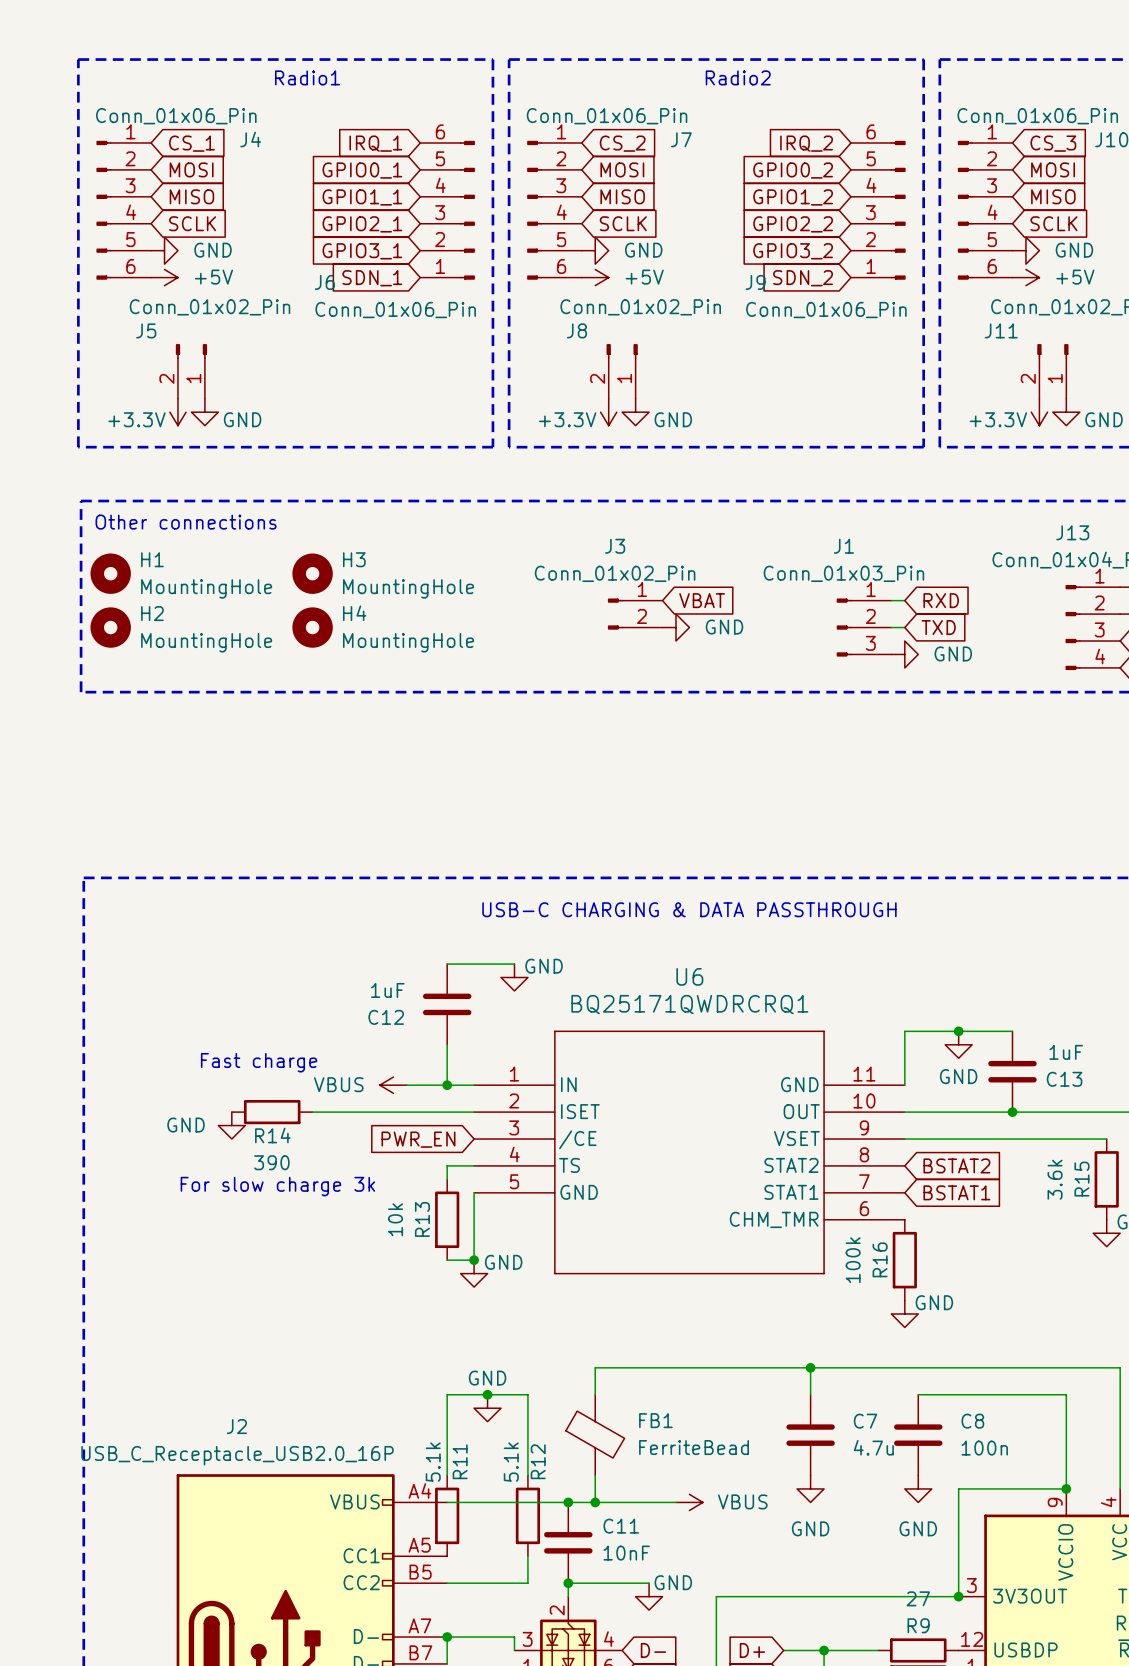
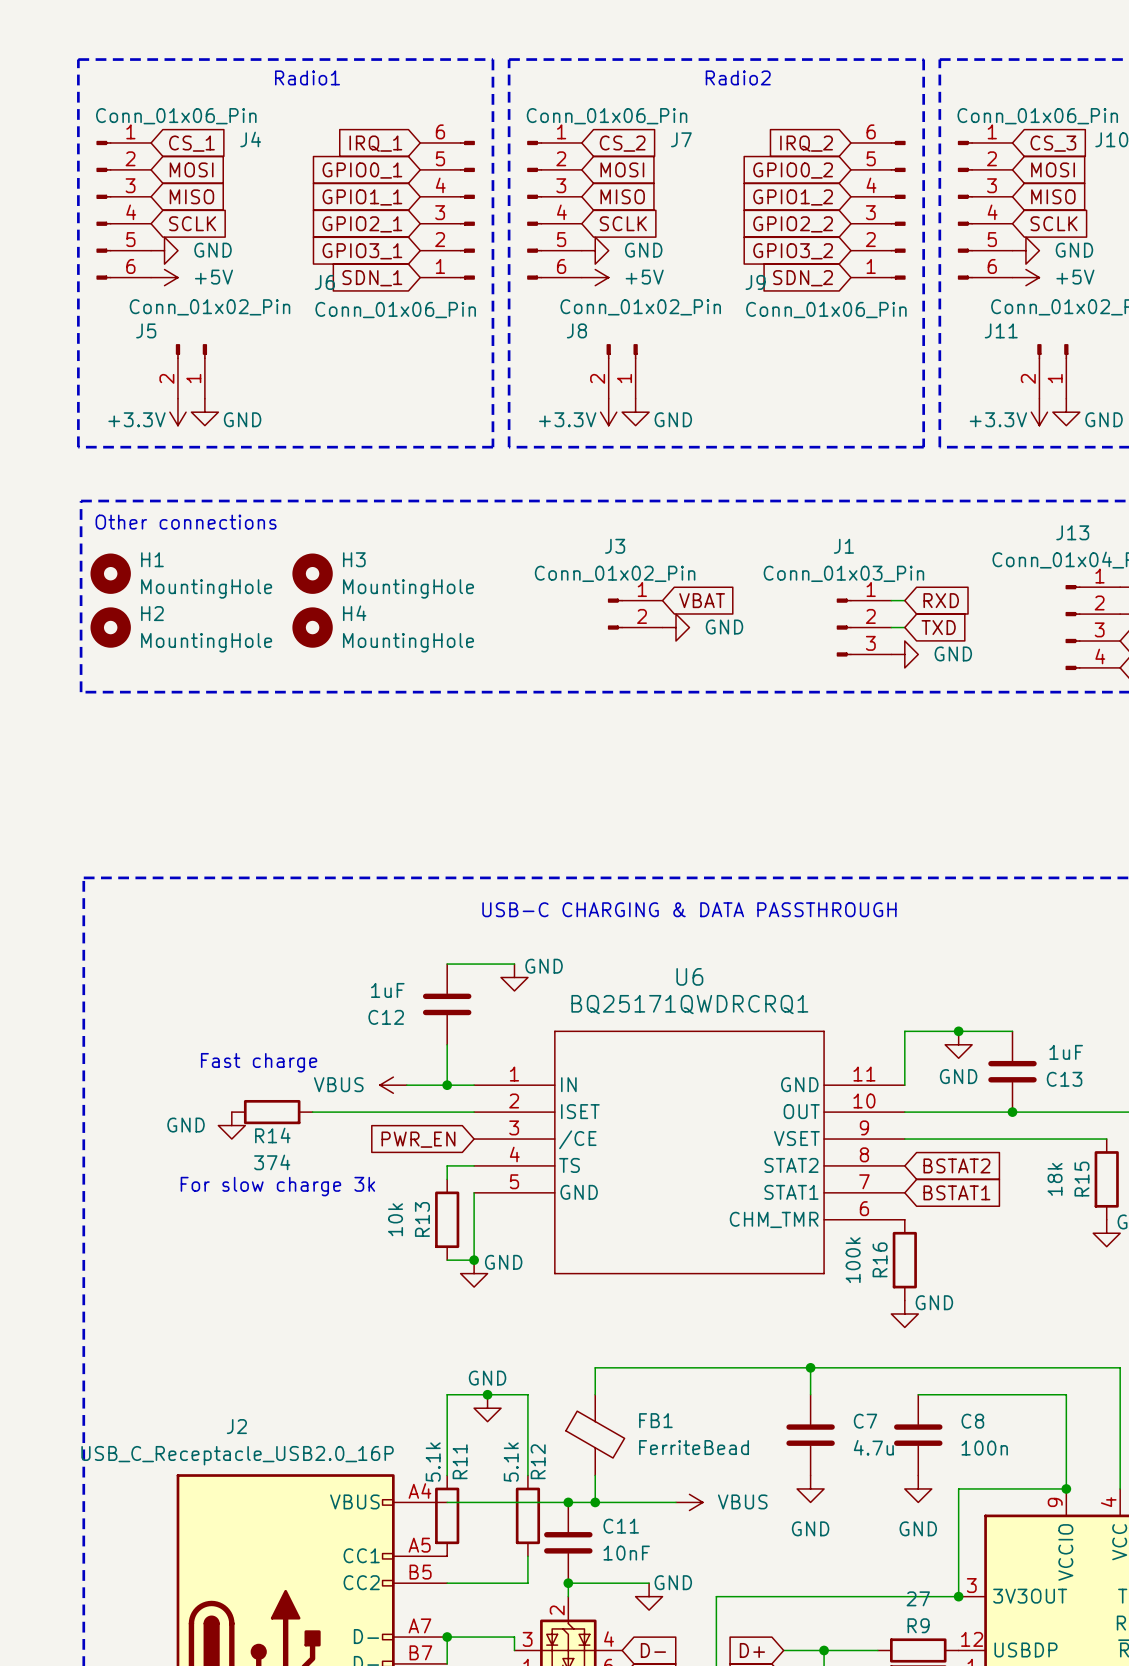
R14 value: 390 (271, 1162) -> 374 (272, 1162)
R15 value: 3.6k (1055, 1179) -> 18k (1055, 1179)

